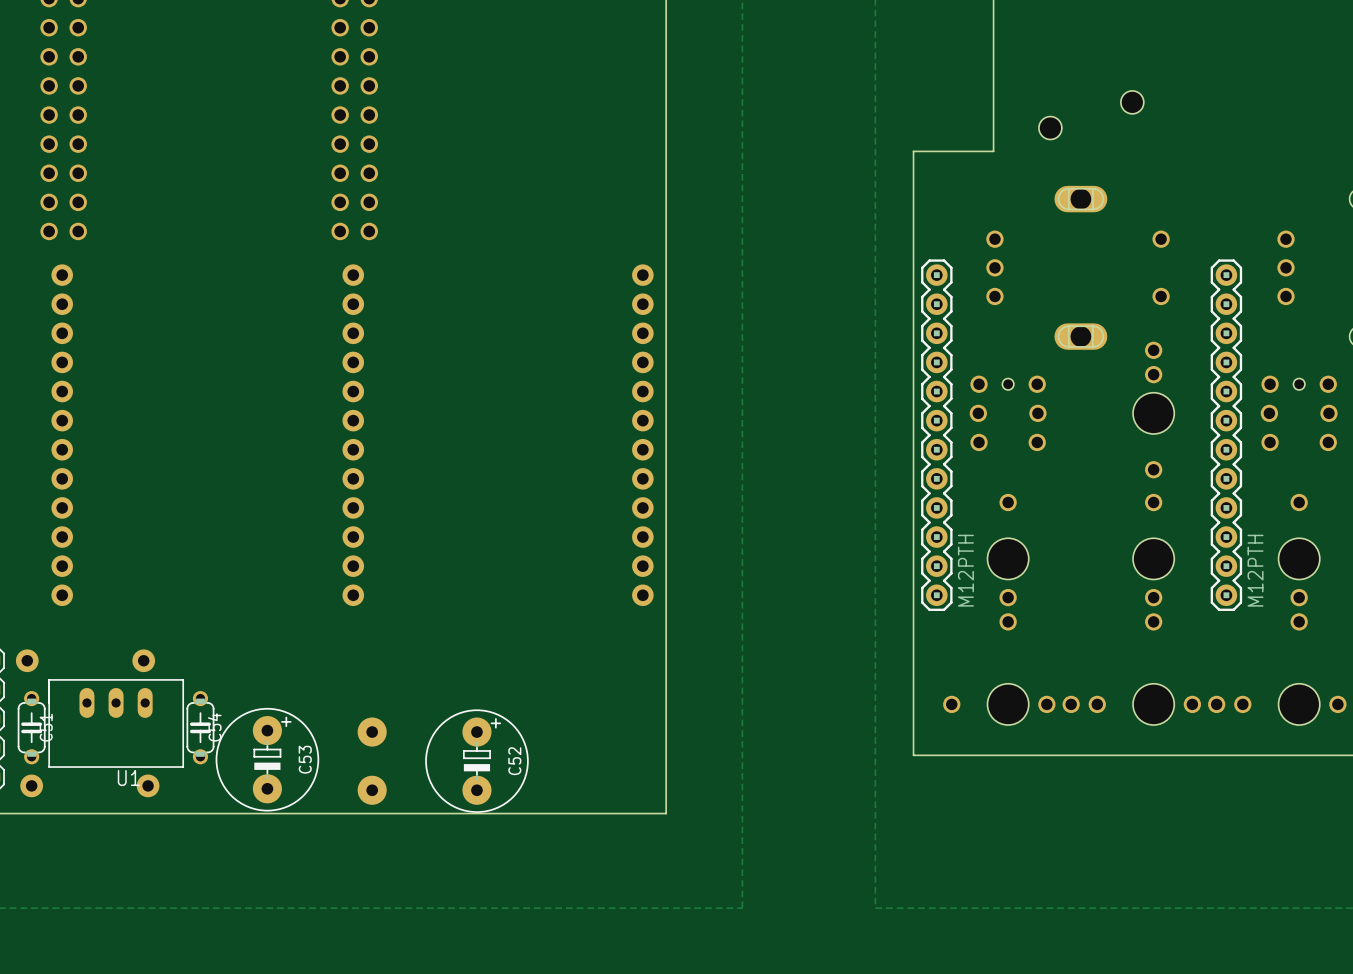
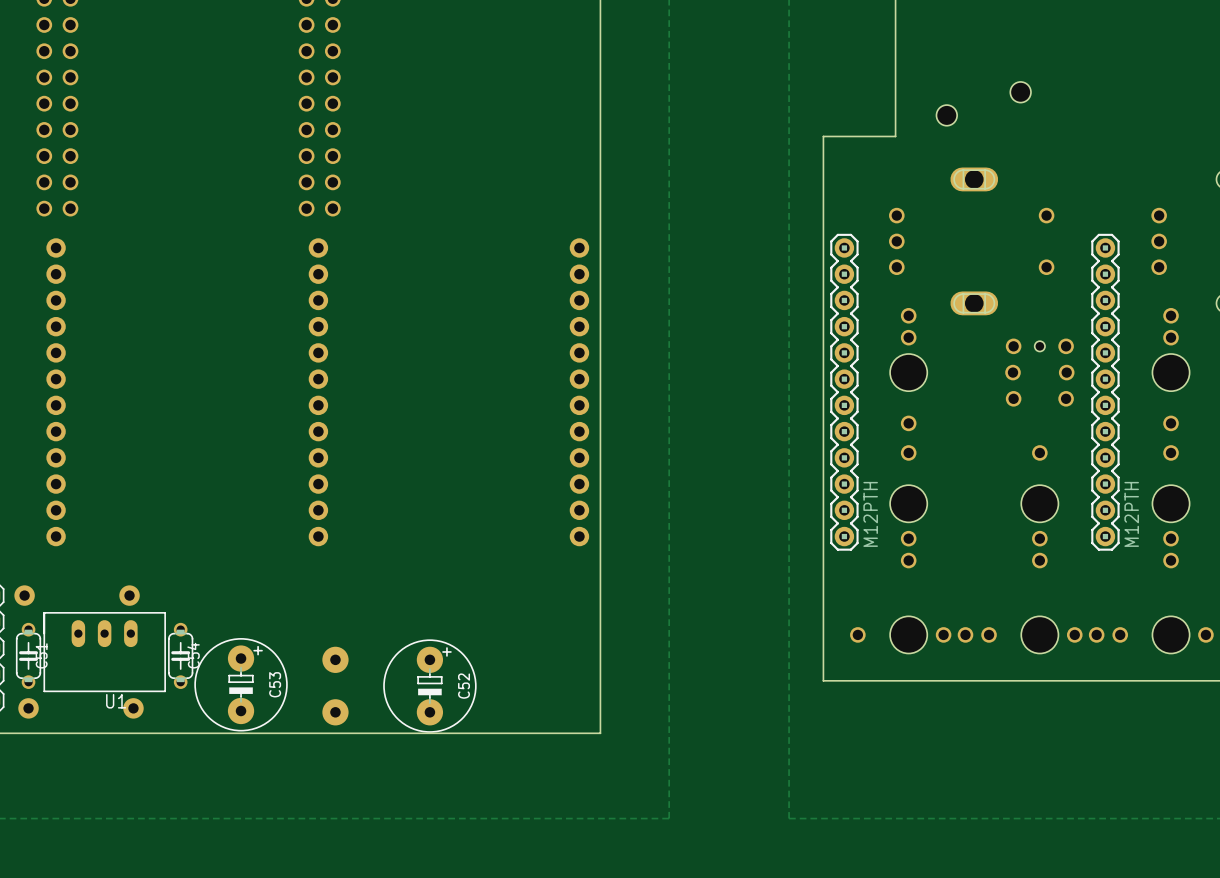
part footprint: [1133, 341, 1175, 479] -> [1005, 338, 1075, 407]
part footprint: [969, 375, 1047, 452] -> [890, 307, 928, 432]
part footprint: [1260, 375, 1338, 452] -> [1152, 307, 1190, 432]

